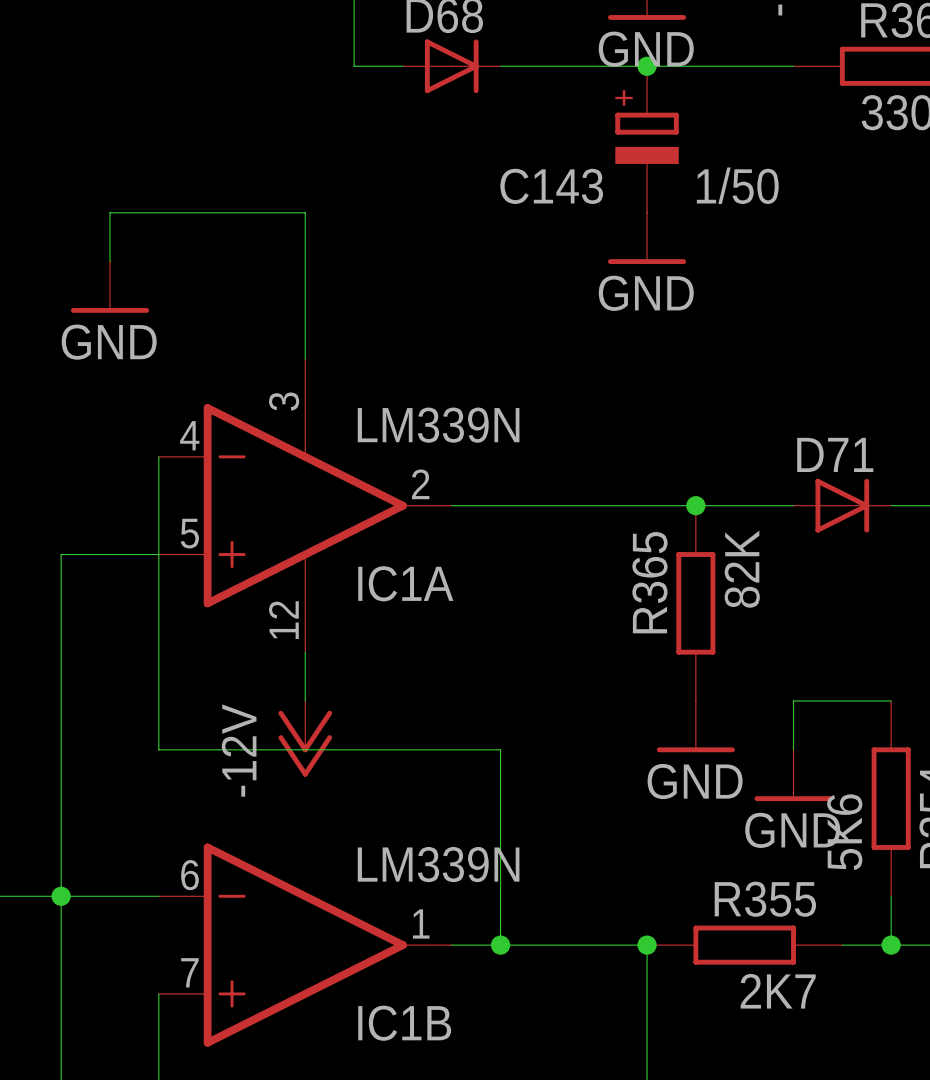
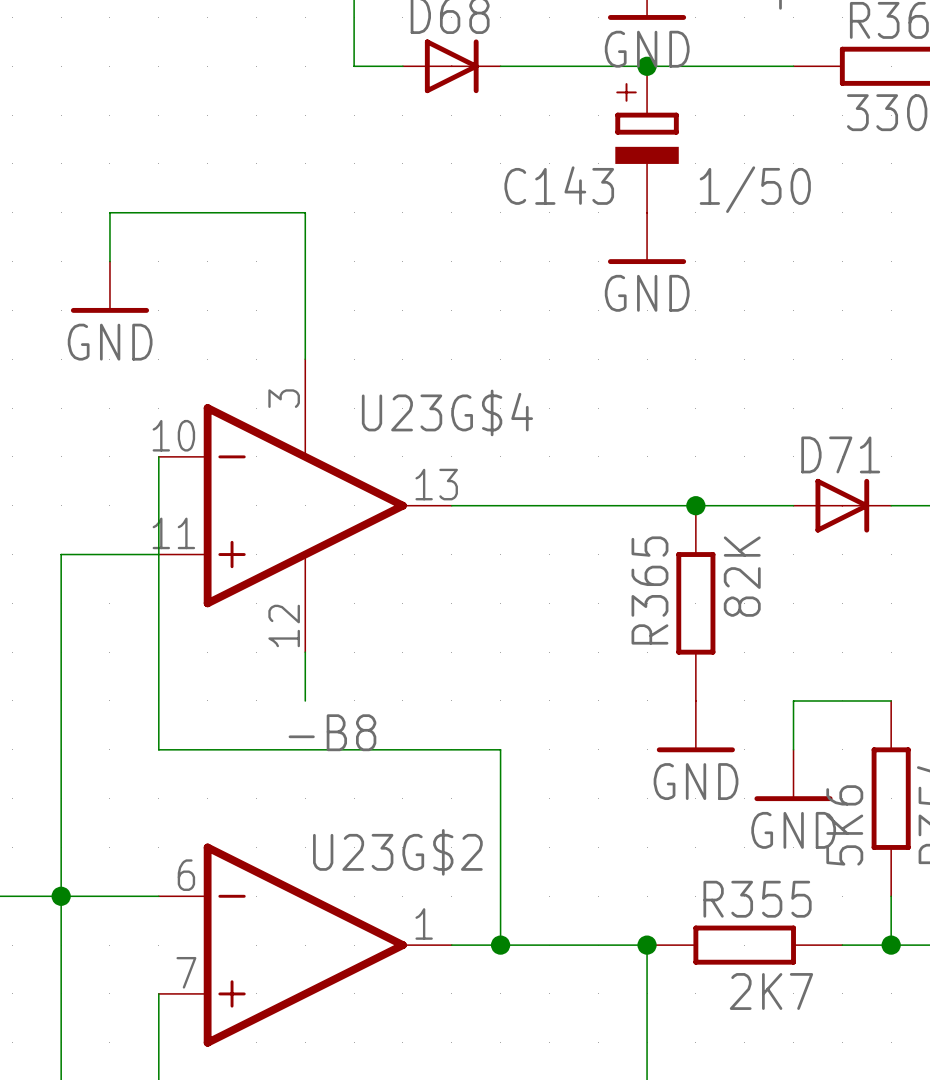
IC1A value: LM339N (438, 425) -> none
IC1A pin number: 4 (189, 435) -> 10 (173, 435)
IC1A pin number: 2 (420, 484) -> 13 (436, 484)
IC1A pin number: 5 (189, 533) -> 11 (173, 533)
IC1A name: IC1A (405, 583) -> U23G$4 (447, 412)
label: none -> -B8 (332, 732)
power symbol: -12V (305, 738) -> none
IC1B value: LM339N (438, 864) -> none
IC1B name: IC1B (404, 1023) -> U23G$2 (397, 852)

